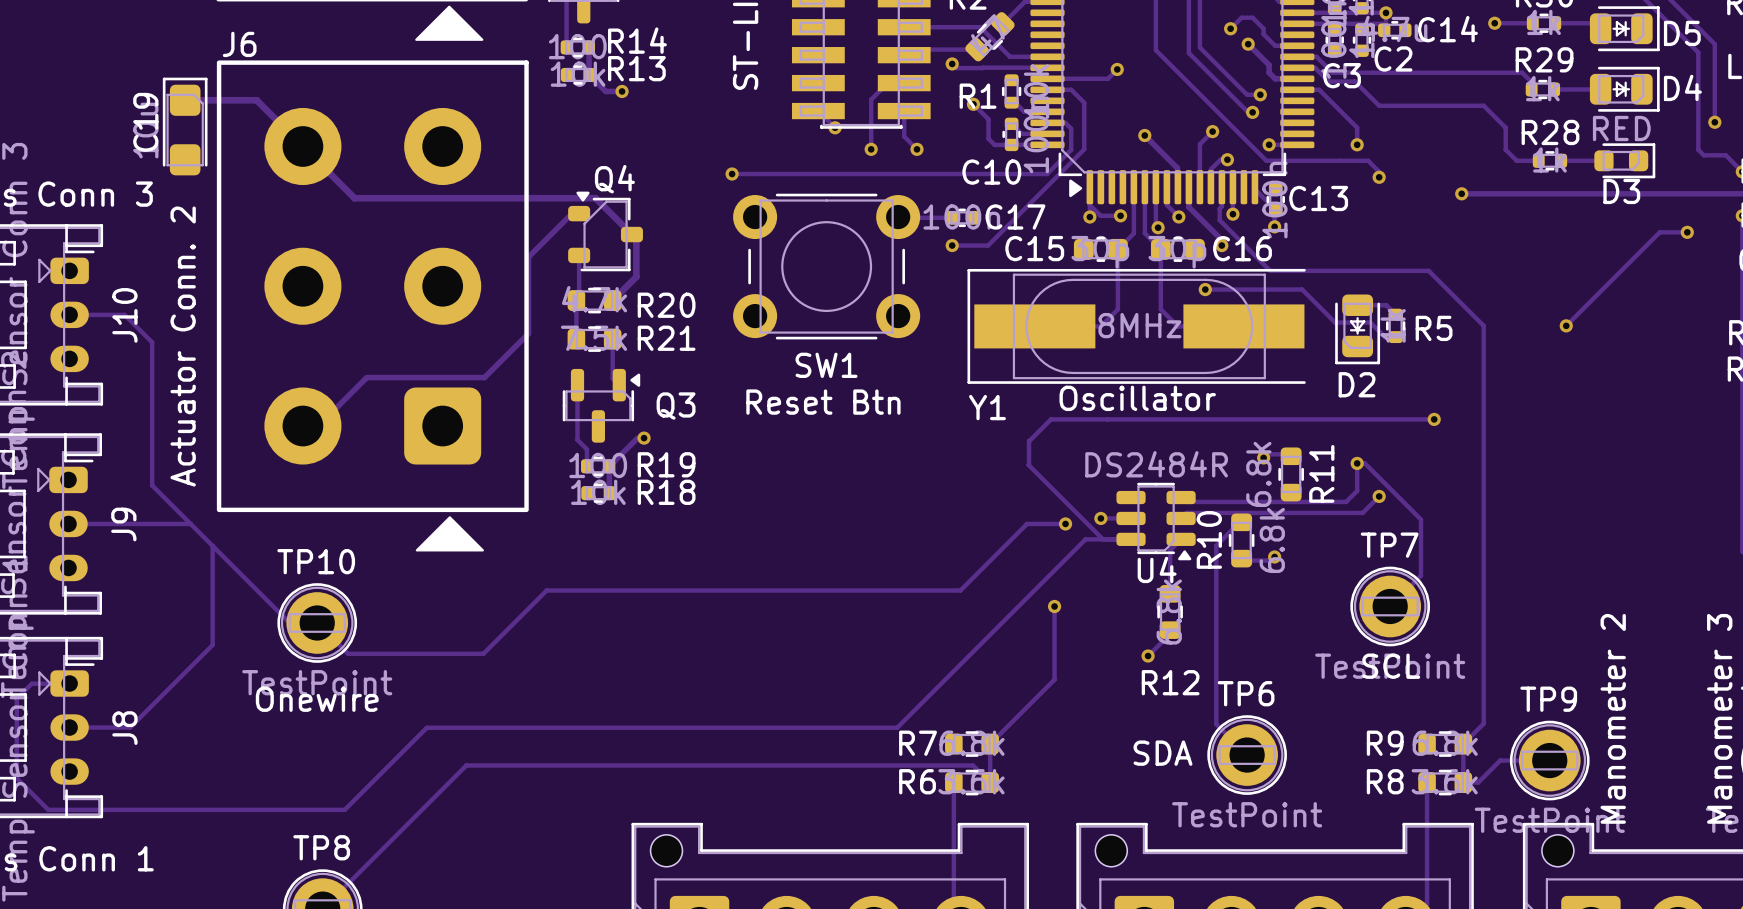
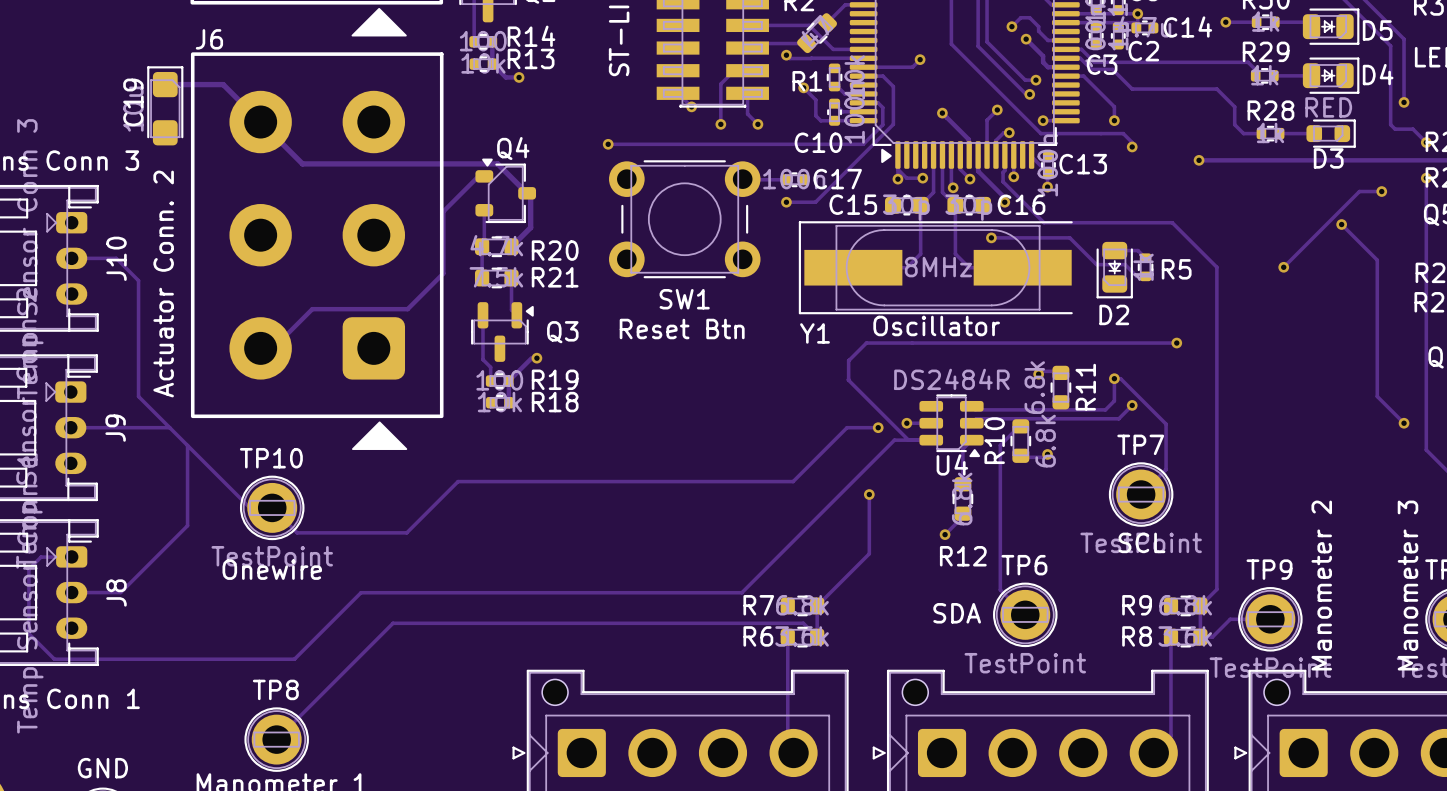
track: none -> (1341, 224) (1377, 260) (1377, 396) (1404, 423)
via: none -> (1341, 224)
via: none -> (1404, 423)

